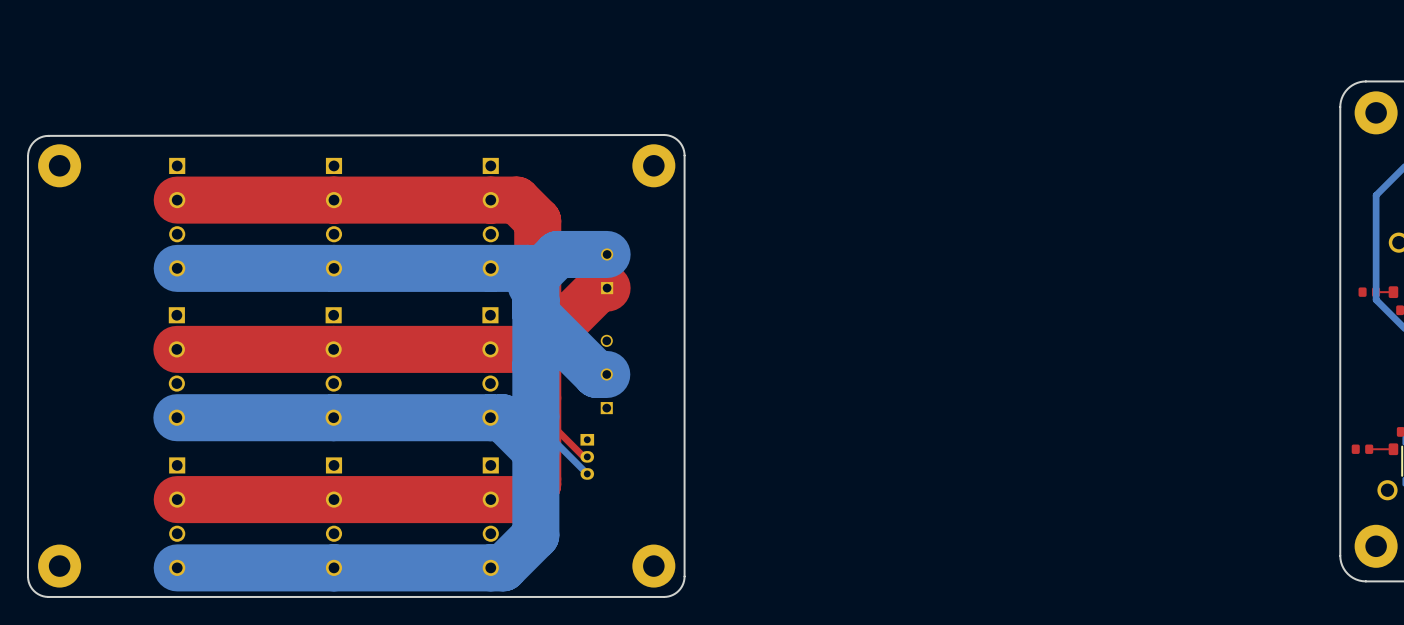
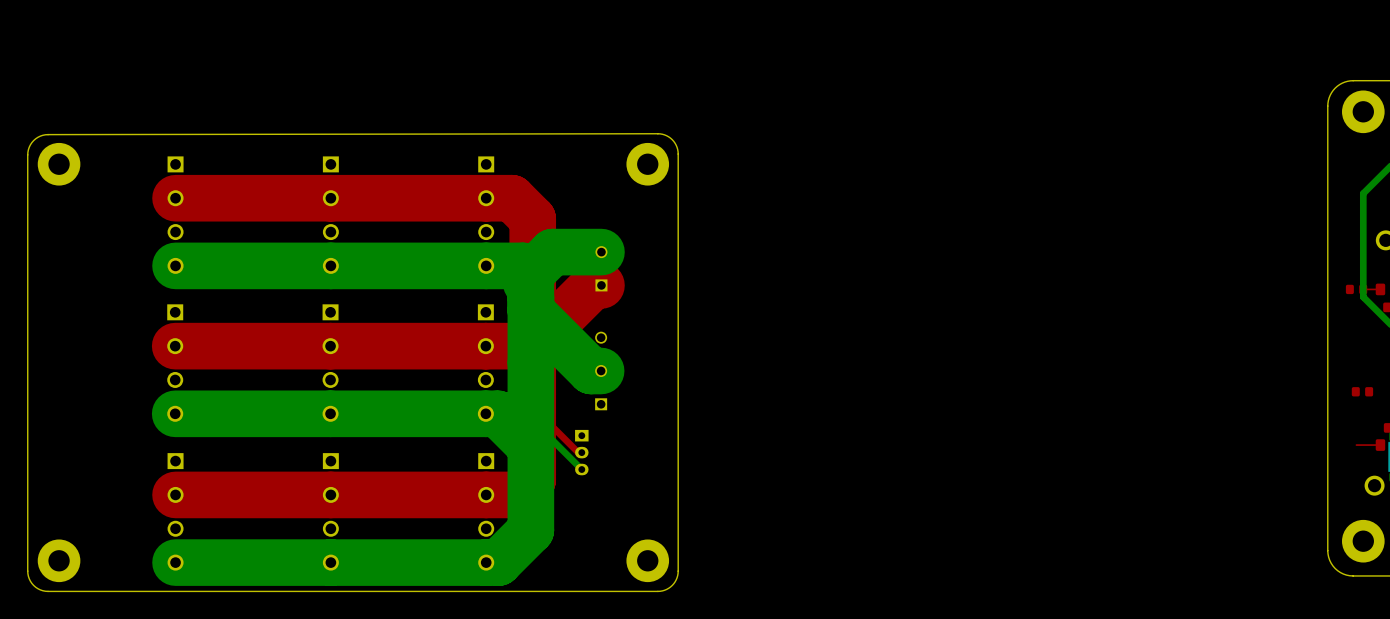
part position: (1362, 449) -> (1362, 391)

